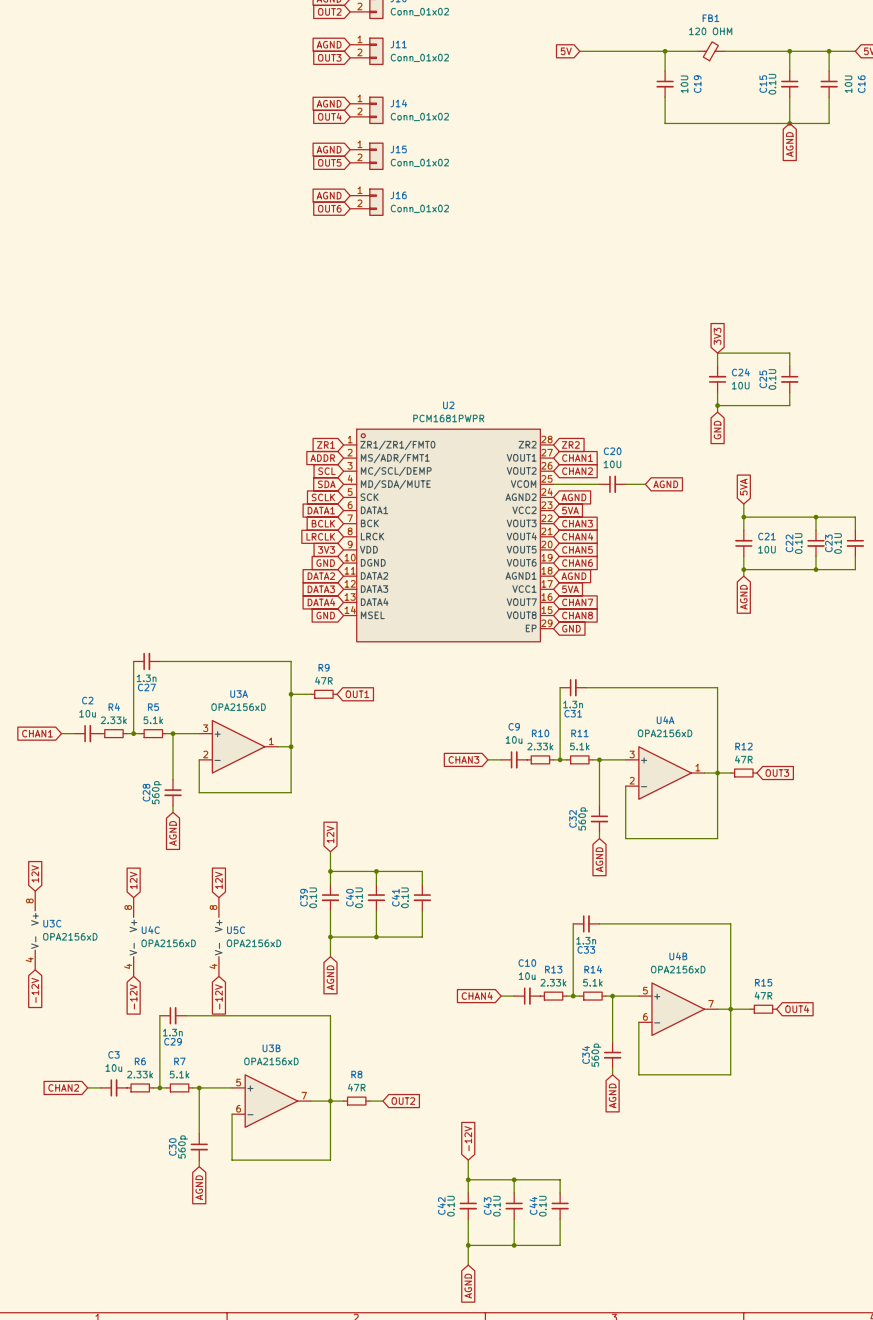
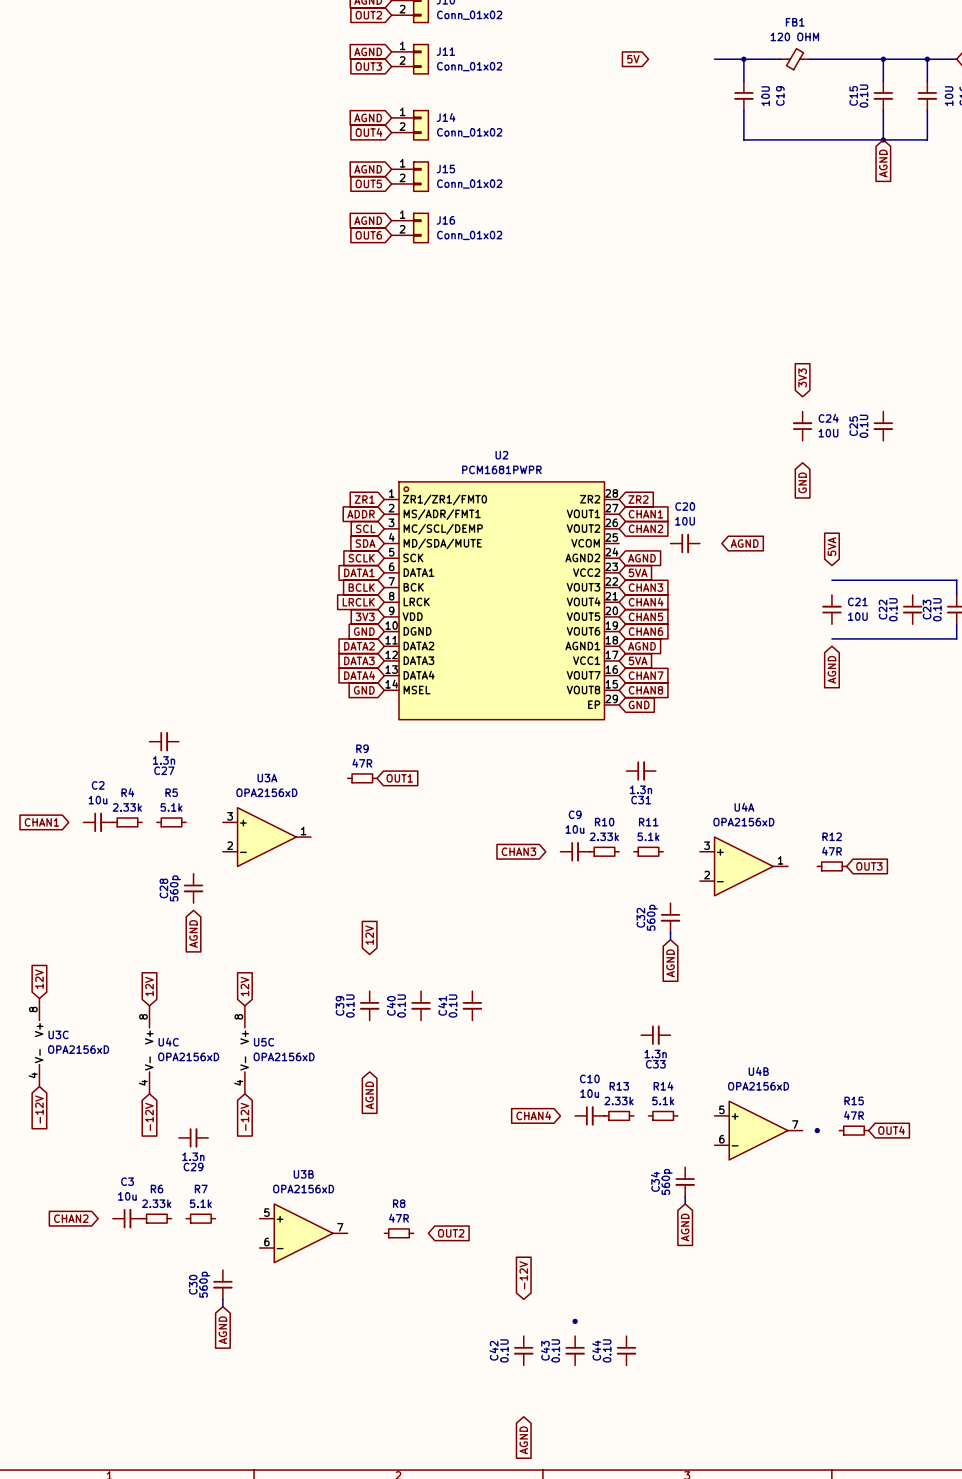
wire: (579, 51) (638, 51) -> none
wire: (717, 366) (717, 353) (789, 353) (789, 366) -> none
wire: (717, 392) (717, 412) -> none
wire: (789, 392) (789, 405) (717, 405) -> none
junction: (717, 405) -> none
wire: (553, 484) (599, 484) -> none
wire: (625, 484) (645, 484) -> none
wire: (743, 504) (743, 530) -> none
junction: (743, 517) -> none
wire: (815, 517) (815, 530) -> none
junction: (815, 517) -> none
wire: (743, 556) (743, 576) -> none
wire: (815, 556) (815, 569) -> none
junction: (743, 569) -> none
junction: (815, 569) -> none
wire: (133, 661) (133, 733) -> none
wire: (159, 661) (291, 661) (291, 792) (199, 792) (199, 759) -> none
wire: (560, 687) (560, 759) -> none
wire: (586, 687) (717, 687) (717, 838) (625, 838) (625, 786) -> none
wire: (291, 694) (310, 694) -> none
junction: (291, 694) -> none
wire: (61, 733) (74, 733) -> none
wire: (127, 733) (140, 733) -> none
junction: (133, 733) -> none
wire: (166, 733) (199, 733) -> none
wire: (173, 733) (173, 779) -> none
junction: (173, 733) -> none
wire: (277, 746) (291, 746) -> none
junction: (291, 746) -> none
wire: (487, 759) (501, 759) -> none
wire: (553, 759) (566, 759) -> none
junction: (560, 759) -> none
wire: (592, 759) (625, 759) -> none
wire: (599, 759) (599, 805) -> none
junction: (599, 759) -> none
wire: (704, 773) (730, 773) -> none
junction: (717, 773) -> none
wire: (173, 805) (173, 812) -> none
wire: (330, 851) (330, 884) -> none
wire: (330, 871) (422, 871) (422, 884) -> none
junction: (330, 871) -> none
wire: (376, 871) (376, 884) -> none
junction: (376, 871) -> none
wire: (330, 910) (330, 956) -> none
wire: (376, 910) (376, 937) -> none
wire: (422, 910) (422, 937) (330, 937) -> none
wire: (573, 923) (573, 996) -> none
wire: (599, 923) (730, 923) (730, 1074) (638, 1074) (638, 1022) -> none
junction: (330, 937) -> none
junction: (376, 937) -> none
wire: (501, 996) (514, 996) -> none
wire: (566, 996) (579, 996) -> none
junction: (573, 996) -> none
wire: (606, 996) (638, 996) -> none
wire: (612, 996) (612, 1042) -> none
junction: (612, 996) -> none
wire: (717, 1009) (750, 1009) -> none
wire: (159, 1015) (159, 1087) -> none
wire: (186, 1015) (330, 1015) (330, 1160) (232, 1160) (232, 1114) -> none
wire: (87, 1087) (100, 1087) -> none
wire: (153, 1087) (166, 1087) -> none
junction: (159, 1087) -> none
wire: (192, 1087) (232, 1087) -> none
wire: (199, 1087) (199, 1133) -> none
junction: (199, 1087) -> none
wire: (310, 1101) (343, 1101) -> none
junction: (330, 1101) -> none
wire: (369, 1101) (382, 1101) -> none
wire: (468, 1160) (468, 1192) -> none
wire: (468, 1179) (560, 1179) (560, 1192) -> none
junction: (468, 1179) -> none
wire: (514, 1179) (514, 1192) -> none
wire: (468, 1219) (468, 1265) -> none
wire: (514, 1219) (514, 1245) -> none
wire: (560, 1219) (560, 1245) (468, 1245) -> none
junction: (468, 1245) -> none
junction: (514, 1245) -> none

